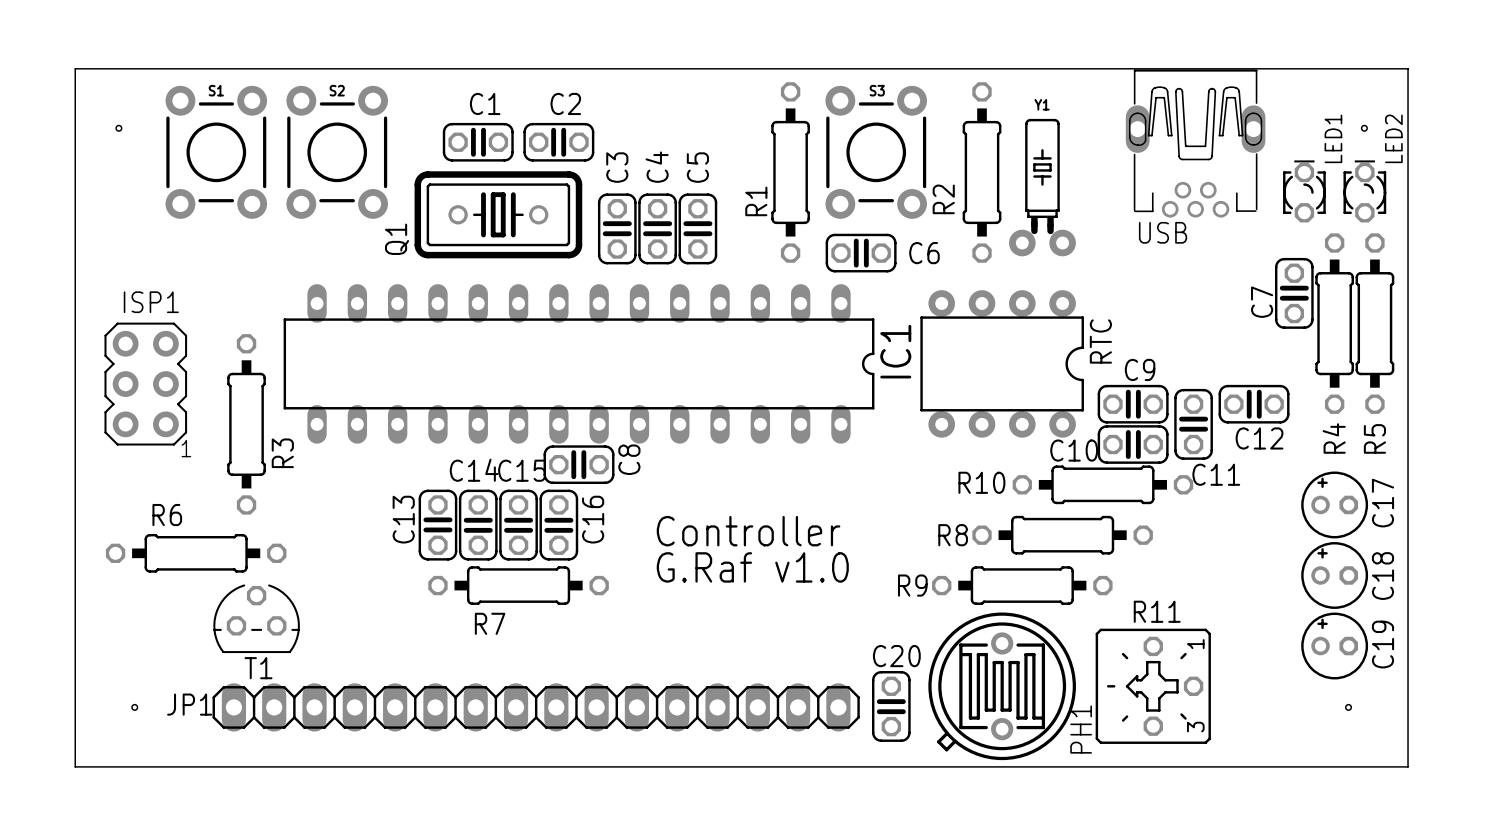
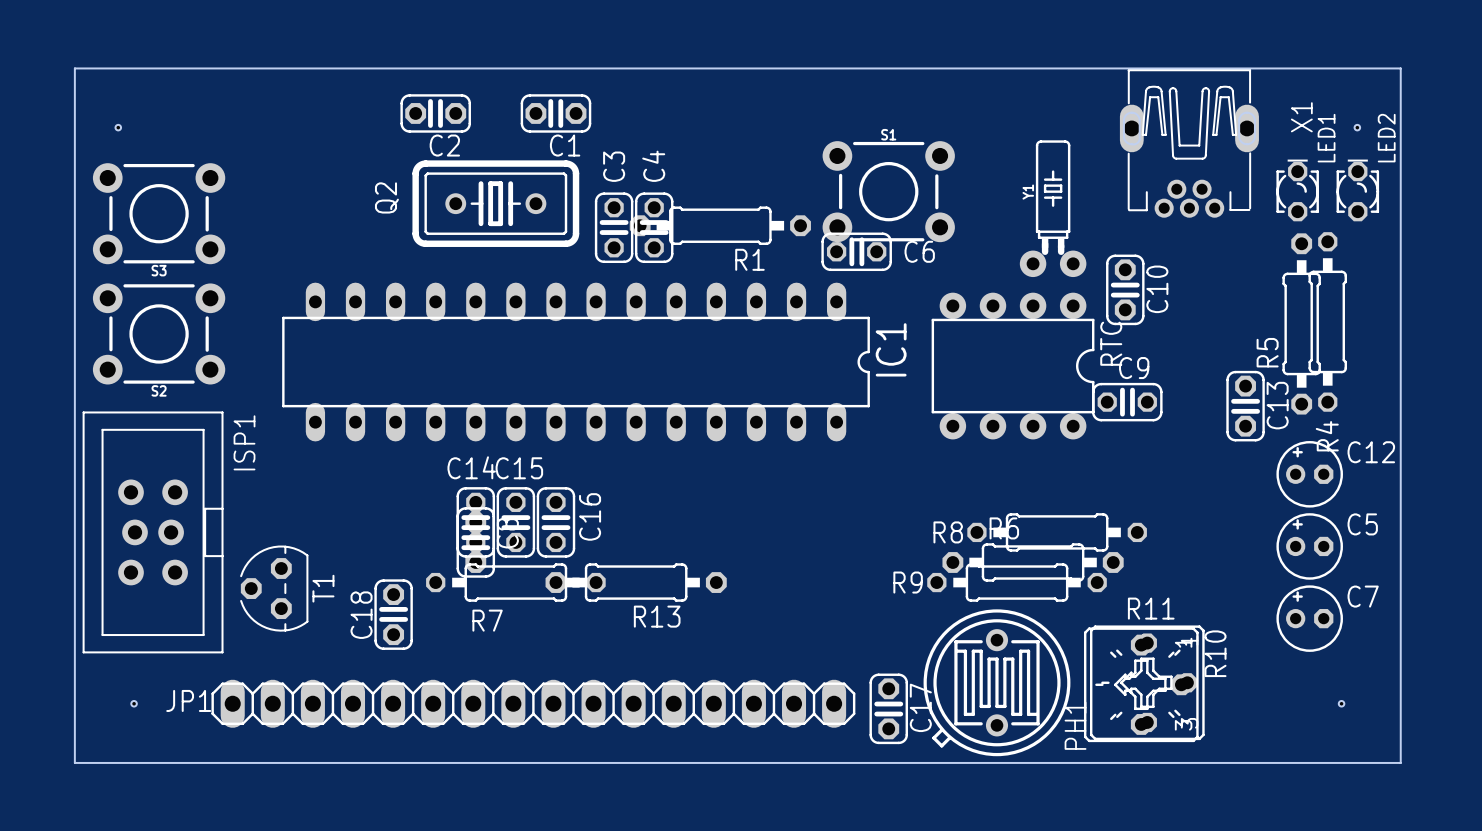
R1 footprint: [771, 82, 810, 263] -> [629, 206, 811, 245]
S2 name position: S2 (337, 90) -> S2 (159, 390)
S3 name position: S3 (877, 90) -> S3 (159, 270)
C1 name position: C1 (485, 103) -> C1 (565, 145)
C2 name position: C2 (565, 103) -> C2 (444, 145)
Y1 name rotation: 0° (1042, 104) -> 90° counterclockwise (1028, 192)
Y1 name position: Y1 (1042, 104) -> Y1 (1028, 192)
C1 footprint: [442, 122, 514, 162] -> [520, 94, 592, 133]
C2 footprint: [523, 122, 595, 162] -> [400, 94, 471, 133]
USB: (1195, 143) -> none
X1: none -> (1189, 143)
S1 rotation: 0° (216, 152) -> 90° clockwise (888, 191)
S1 position: (216, 152) -> (888, 191)
S2 rotation: 0° (337, 152) -> 90° clockwise (159, 333)
S2 position: (337, 152) -> (159, 333)
S3 rotation: 0° (876, 152) -> 90° clockwise (159, 213)
S3 position: (876, 152) -> (159, 213)
C5 name position: C5 (697, 167) -> C5 (1362, 524)
R2: (982, 172) -> none
Y1 position: (1042, 187) -> (1053, 208)
C5 footprint: [678, 193, 718, 265] -> [1276, 513, 1343, 580]
R1 name position: R1 (756, 201) -> R1 (749, 259)
Q2: none -> (495, 203)
Q1: (498, 214) -> none
R5 footprint: [1355, 233, 1395, 414] -> [1282, 233, 1321, 415]
C7 footprint: [1274, 257, 1314, 329] -> [1276, 585, 1343, 652]
ISP1 name position: ISP1 (151, 302) -> ISP1 (244, 442)
C7 name position: C7 (1262, 302) -> C7 (1363, 596)
ISP1 footprint: [104, 322, 188, 446] -> [82, 411, 224, 654]
RTC position: (1002, 363) -> (1013, 366)
C12 footprint: [1218, 384, 1290, 424] -> [1276, 441, 1343, 508]
R3: (246, 424) -> none
C11: (1193, 424) -> none
C10 footprint: [1097, 425, 1169, 464] -> [1106, 254, 1145, 326]
C12 name position: C12 (1259, 438) -> C12 (1371, 452)
R5 name position: R5 (1374, 438) -> R5 (1267, 352)
C8 footprint: [543, 445, 615, 485] -> [456, 507, 496, 578]
C10 name position: C10 (1074, 450) -> C10 (1157, 289)
R10 footprint: [1012, 465, 1194, 505] -> [1083, 627, 1199, 743]
C17 footprint: [1301, 471, 1369, 539] -> [869, 673, 908, 745]
R10 name position: R10 (981, 482) -> R10 (1215, 653)
C13 footprint: [418, 489, 458, 561] -> [1226, 370, 1265, 442]
C13 name position: C13 (403, 519) -> C13 (1277, 405)
text: Controller (748, 531) -> none
R6 footprint: [105, 533, 287, 573] -> [942, 543, 1124, 582]
C18 footprint: [1301, 542, 1369, 609] -> [374, 579, 413, 650]
text: G.Raf v1.0 (752, 567) -> none
C18 name position: C18 (1382, 576) -> C18 (361, 615)
T1 footprint: [213, 584, 300, 654] -> [240, 545, 309, 632]
R13: none -> (636, 582)
C19: (1334, 646) -> none
T1 name position: T1 (258, 668) -> T1 (323, 588)
C20: (891, 706) -> none

